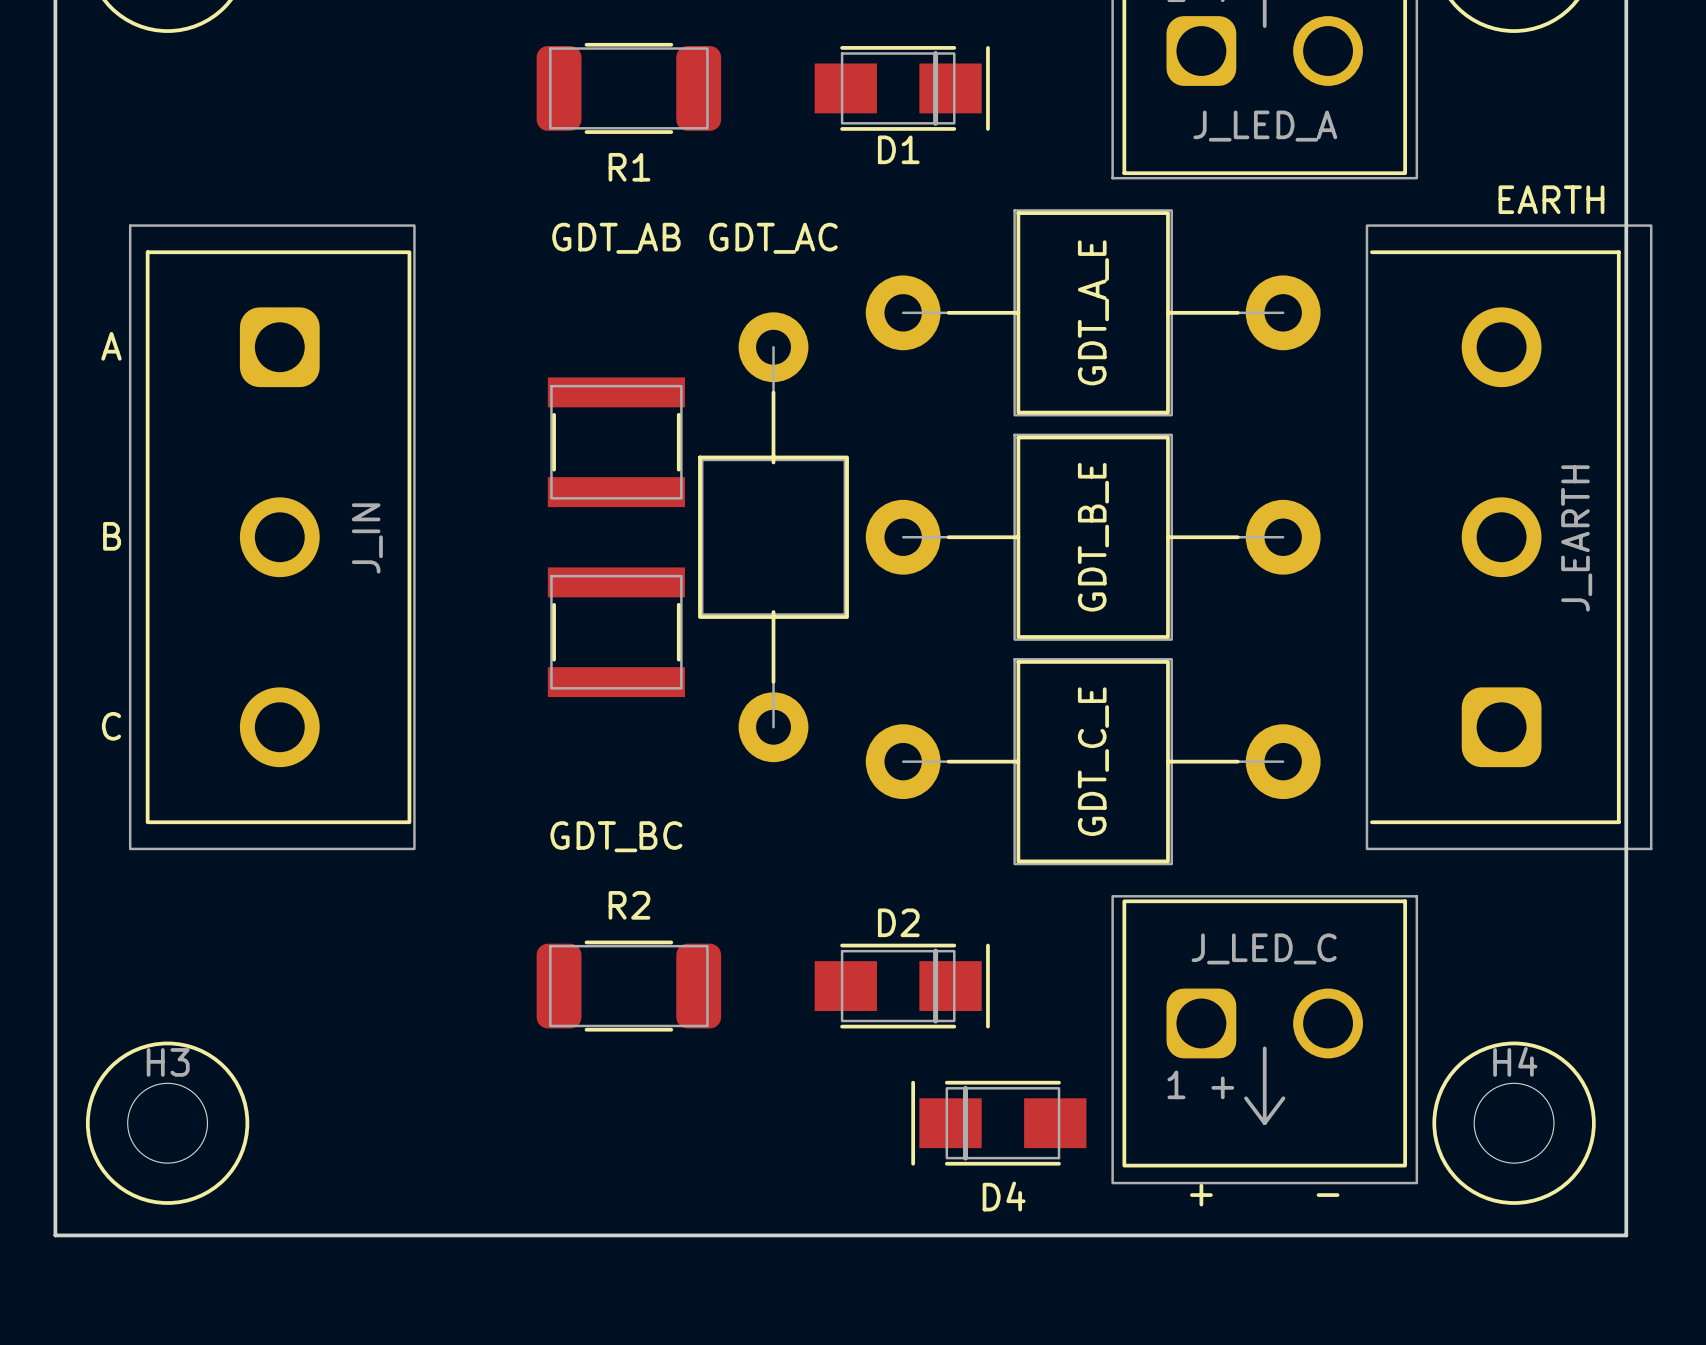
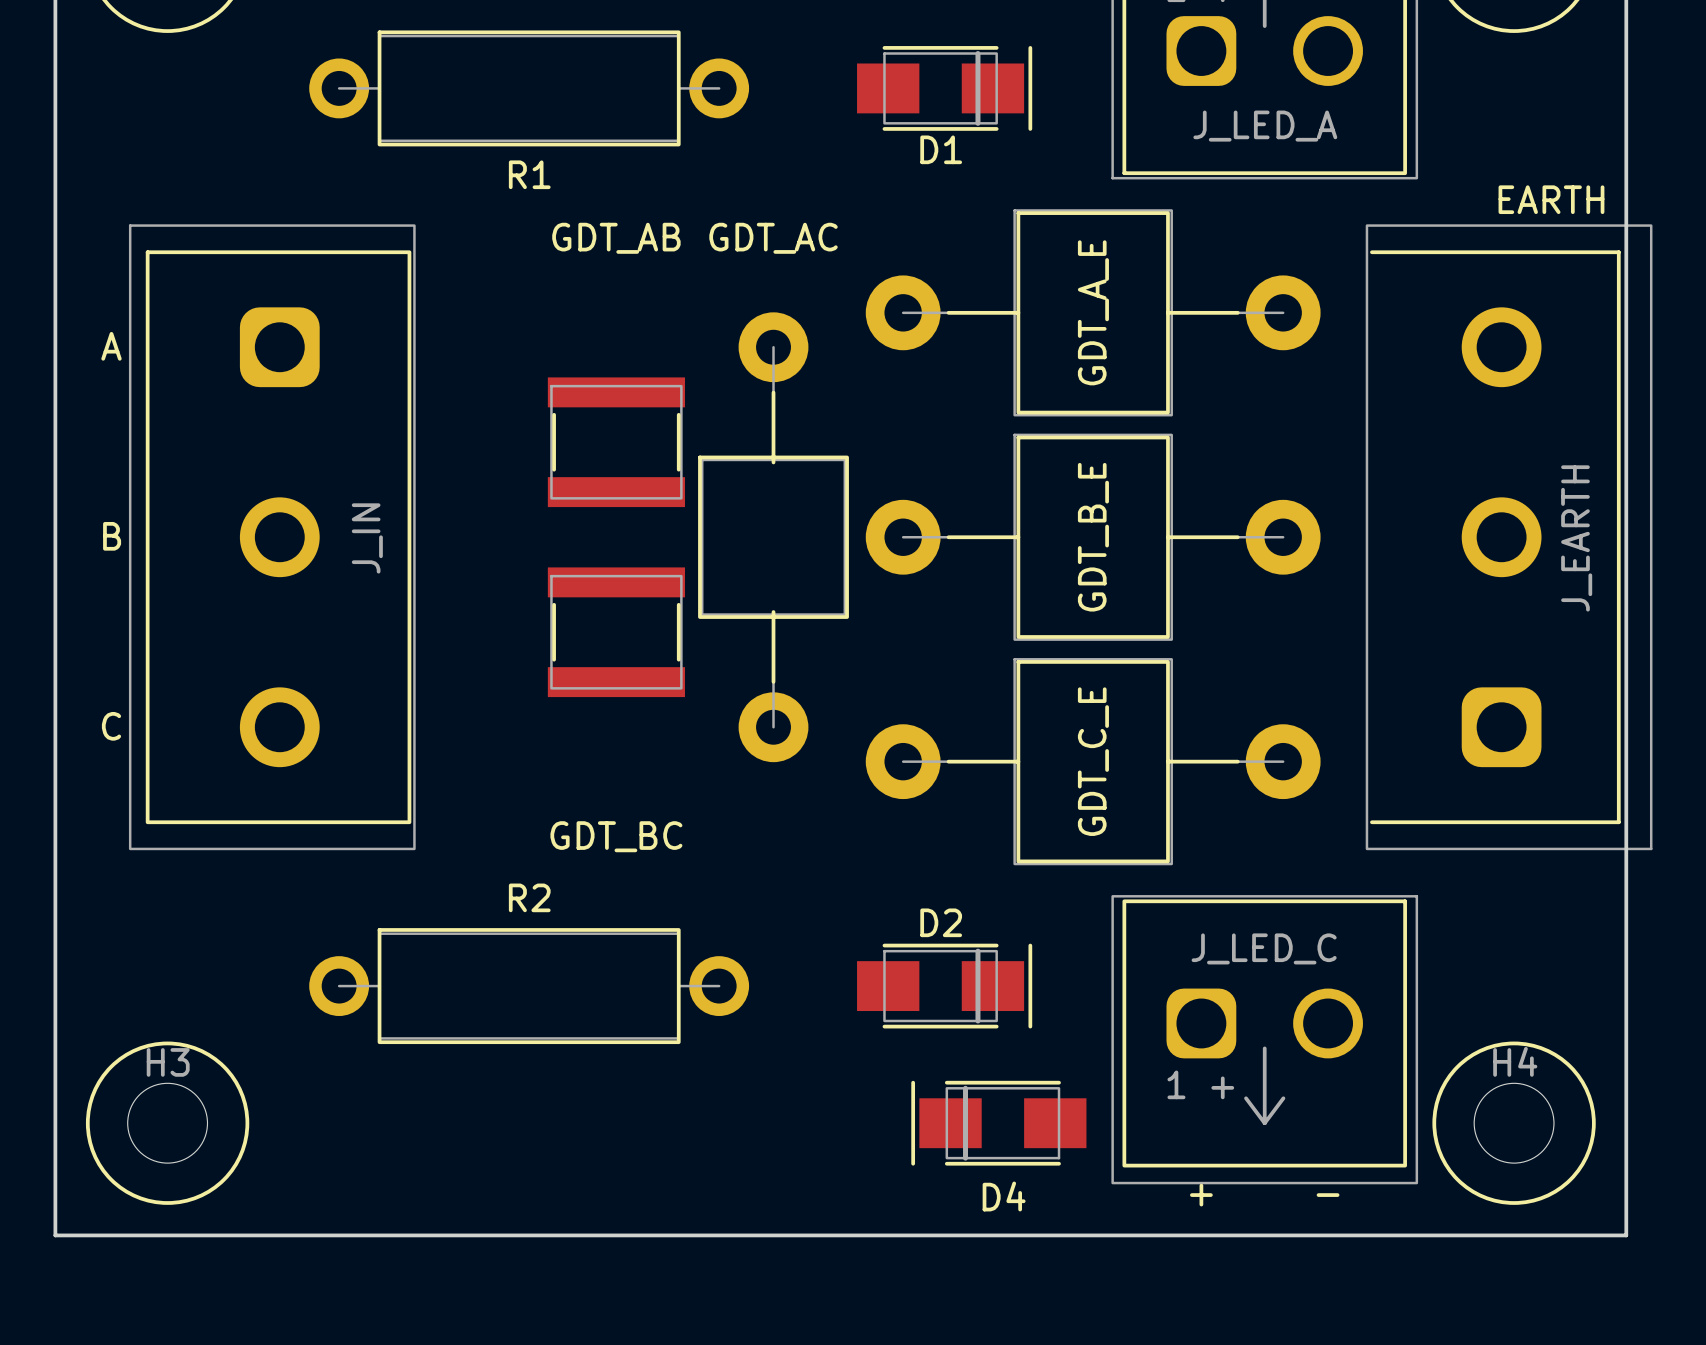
R1 footprint: [536, 42, 722, 134] -> [309, 30, 750, 147]
D1 position: (902, 88) -> (944, 88)
R2 footprint: [536, 940, 722, 1032] -> [309, 928, 750, 1045]
D2 position: (902, 986) -> (944, 986)

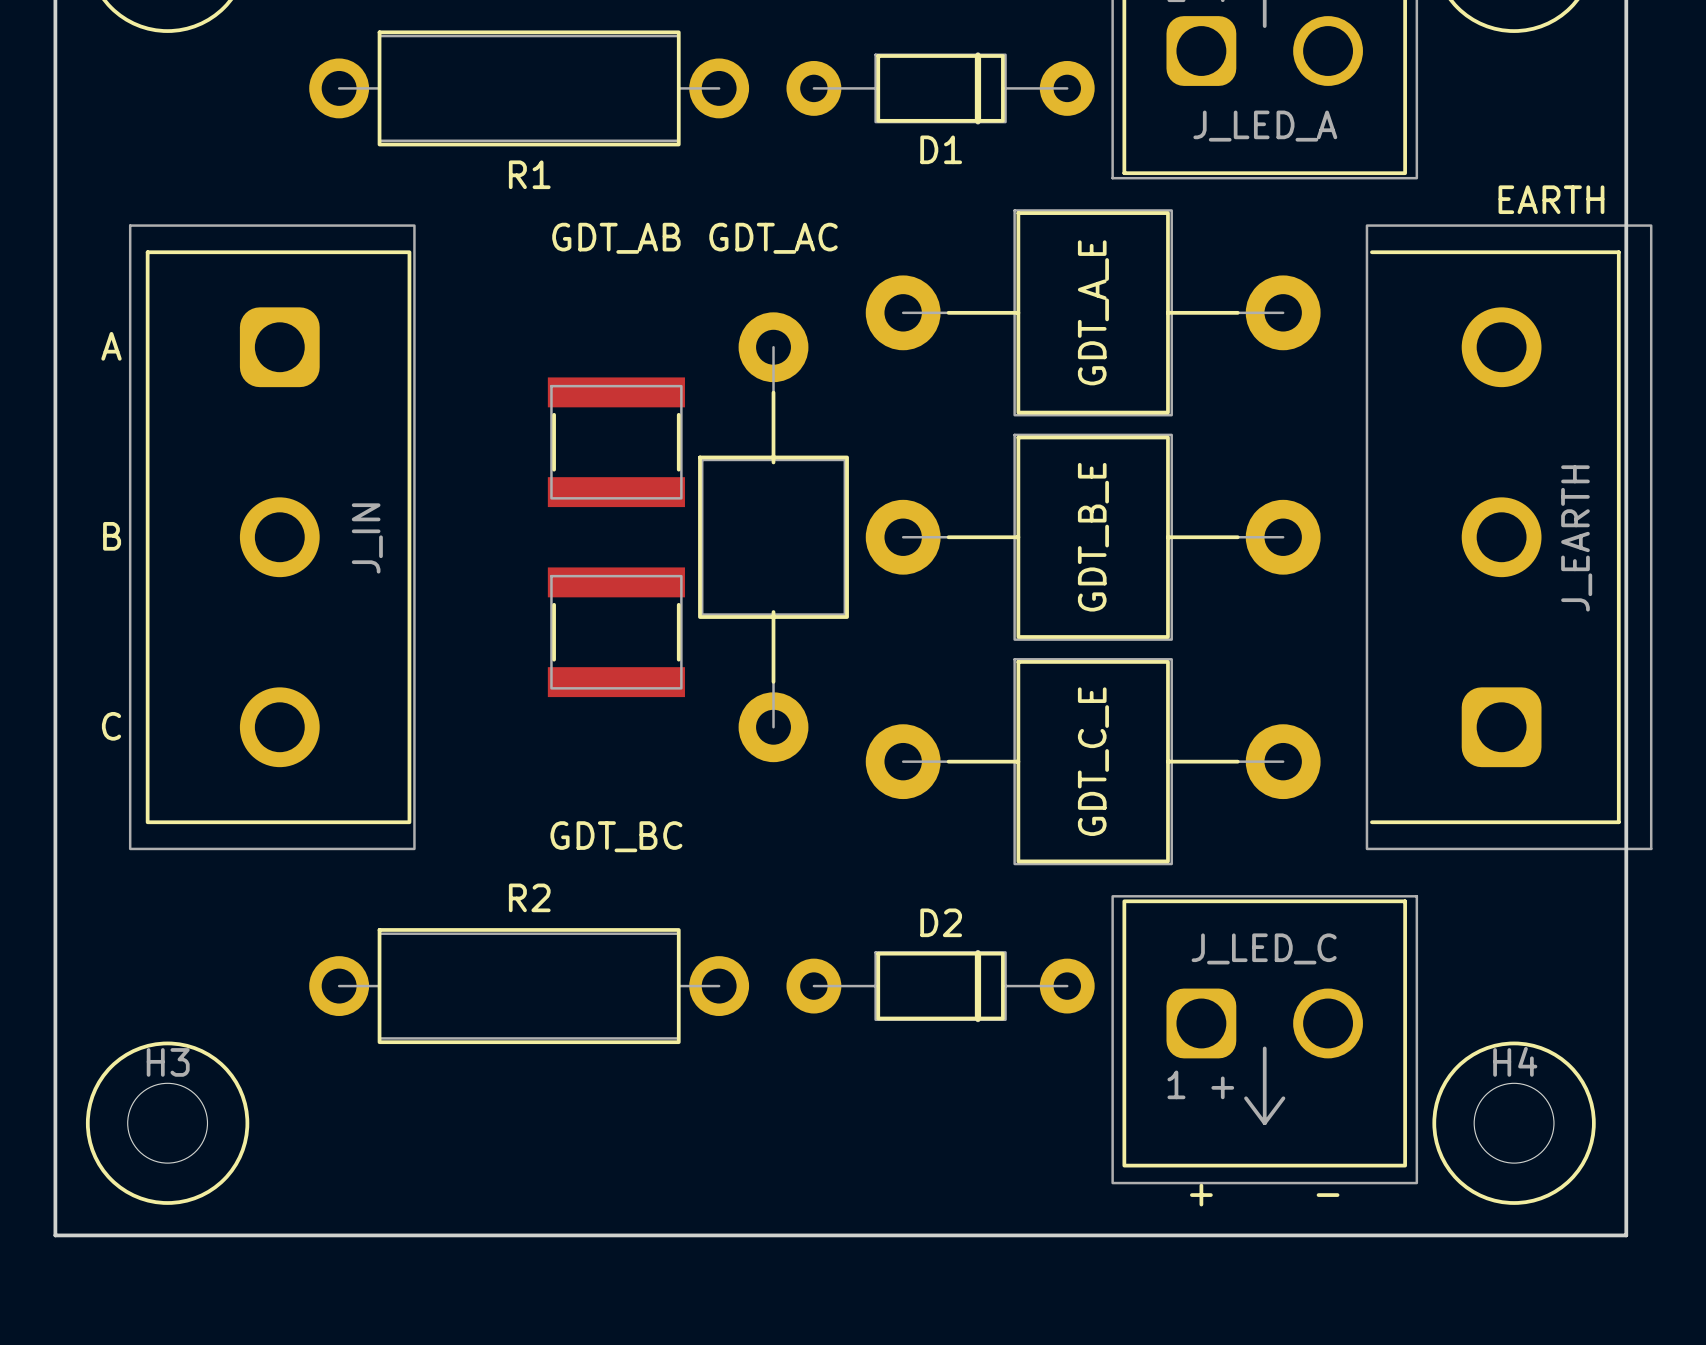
D1 footprint: [857, 46, 1033, 131] -> [786, 52, 1095, 125]
D2 footprint: [857, 943, 1033, 1029] -> [786, 949, 1095, 1023]
D4: (998, 1123) -> none

